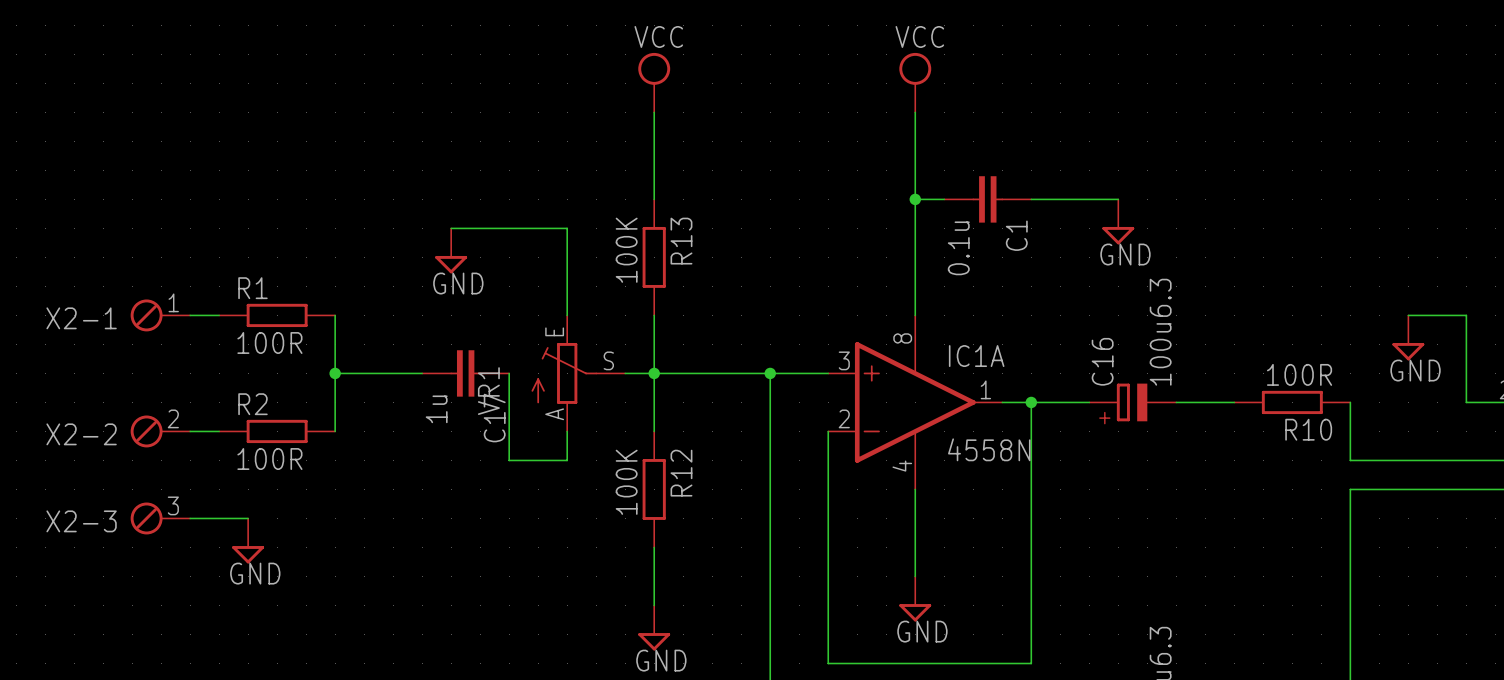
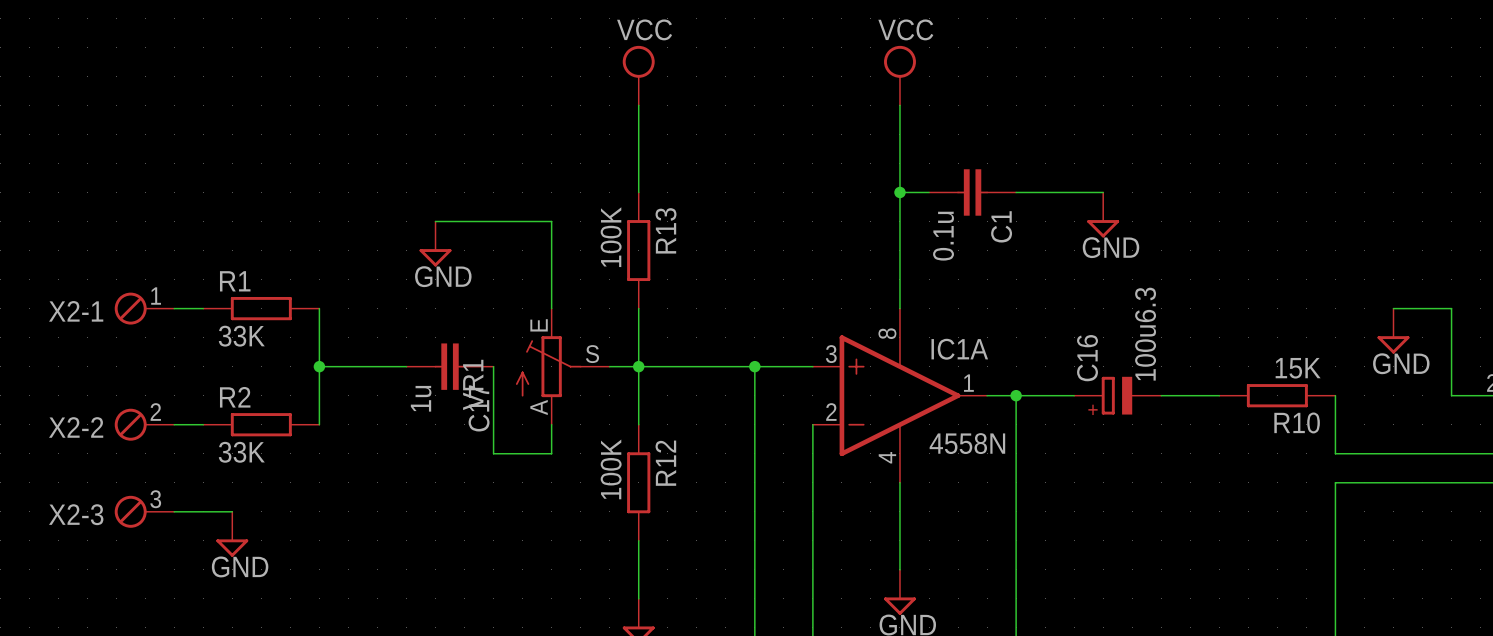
R1 value: 100R (269, 342) -> 33K (241, 336)
R10 value: 100R (1299, 374) -> 15K (1298, 368)
R2 value: 100R (269, 459) -> 33K (241, 452)

